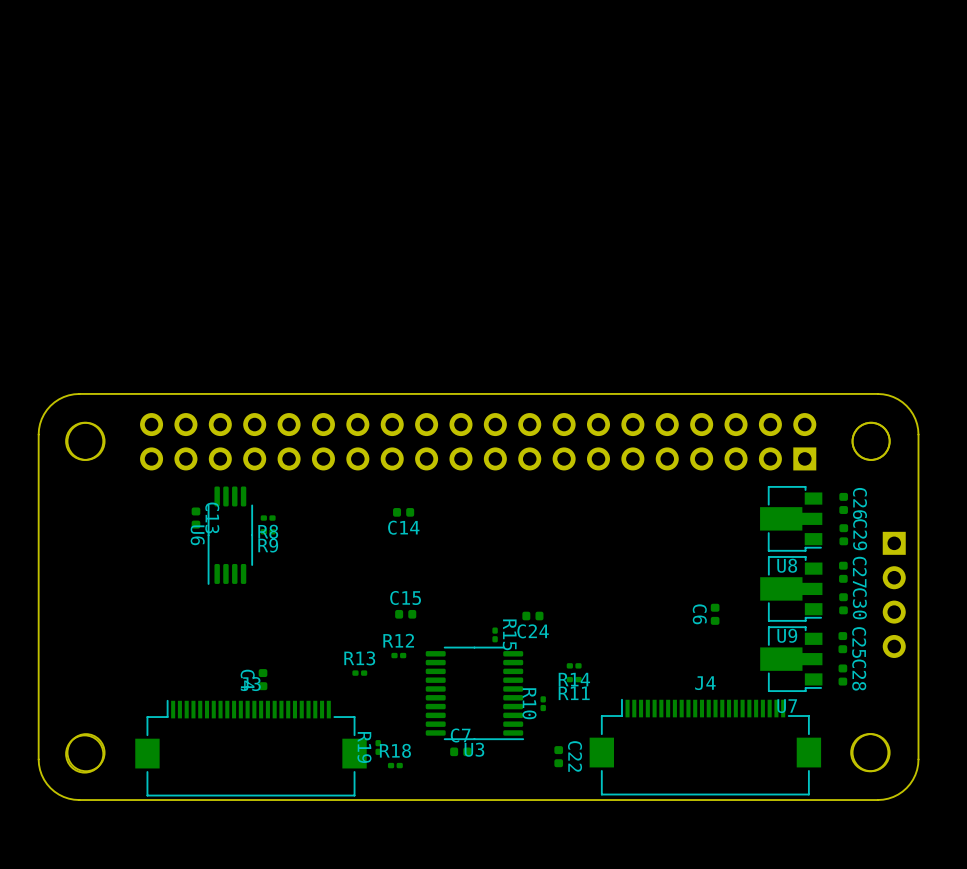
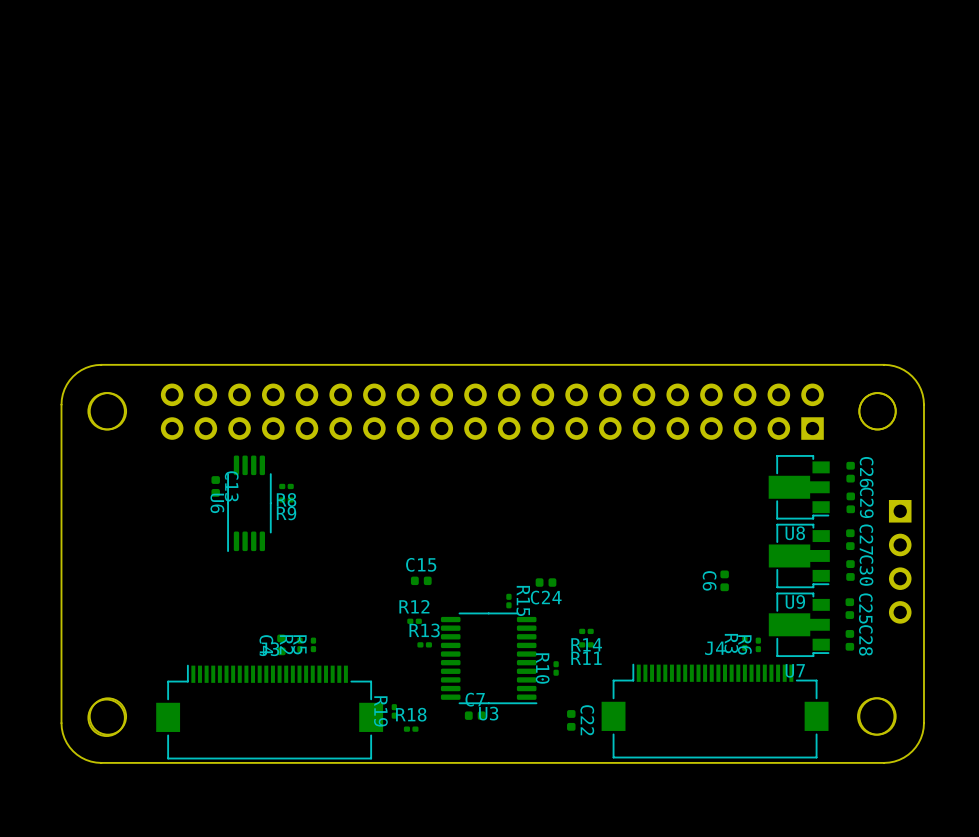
C14: (403, 512) -> none
R13 position: (359, 673) -> (424, 644)
R3: none -> (744, 643)
R2: none -> (299, 644)
R5: none -> (313, 644)
R6: none -> (758, 644)

